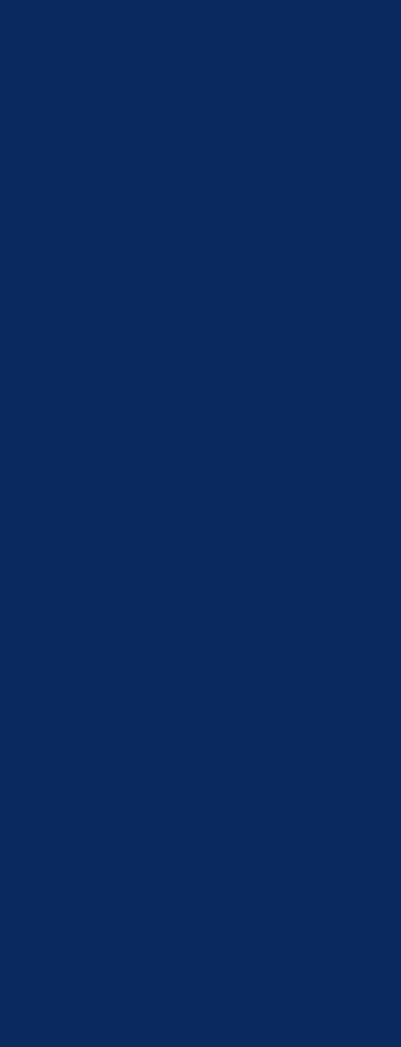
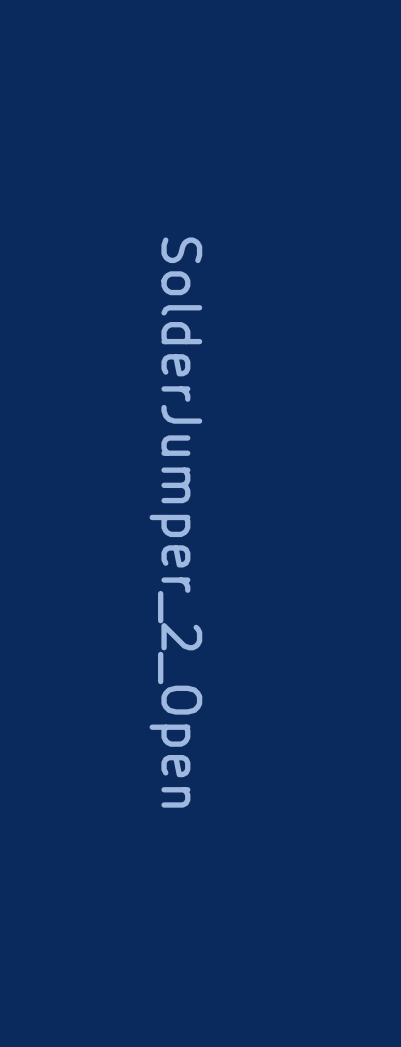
part: none -> SolderJumper_2_Open (175, 522)

